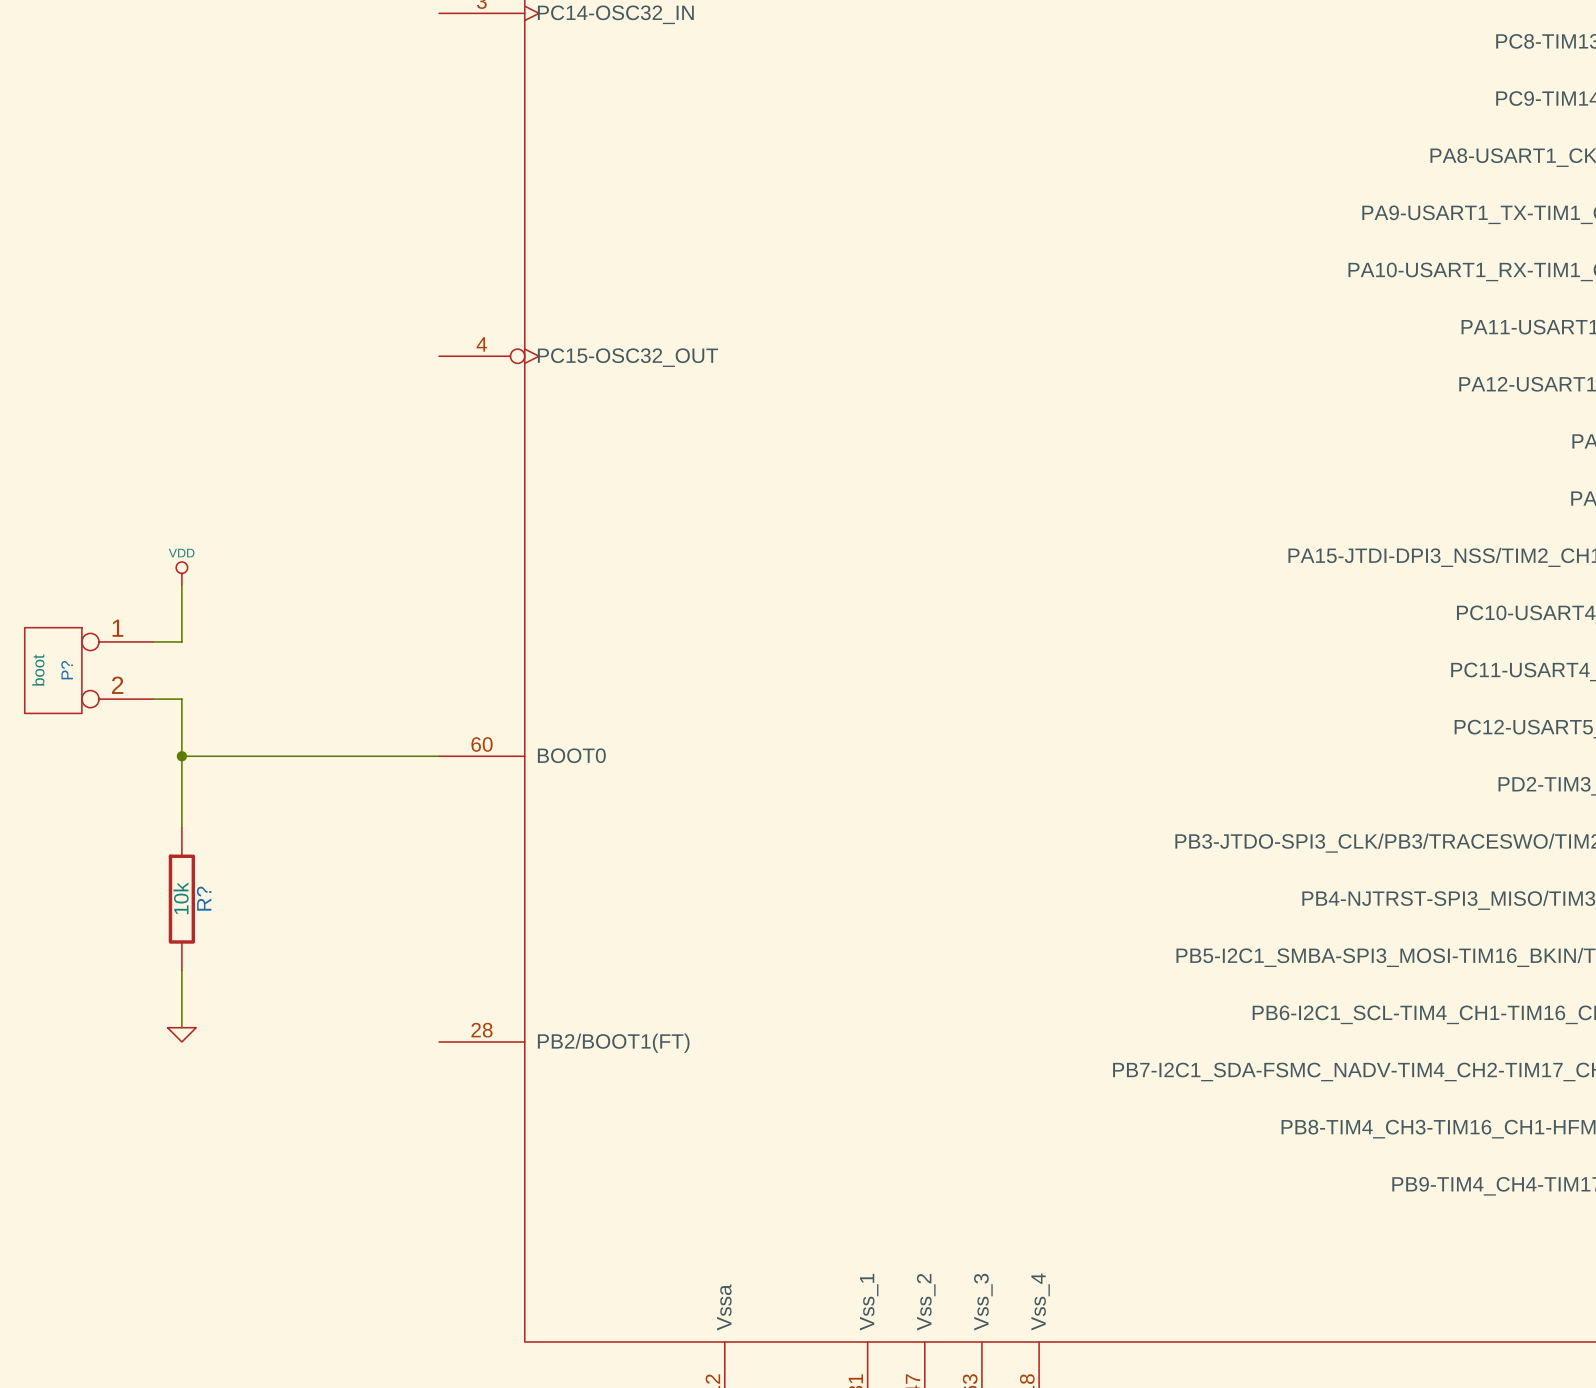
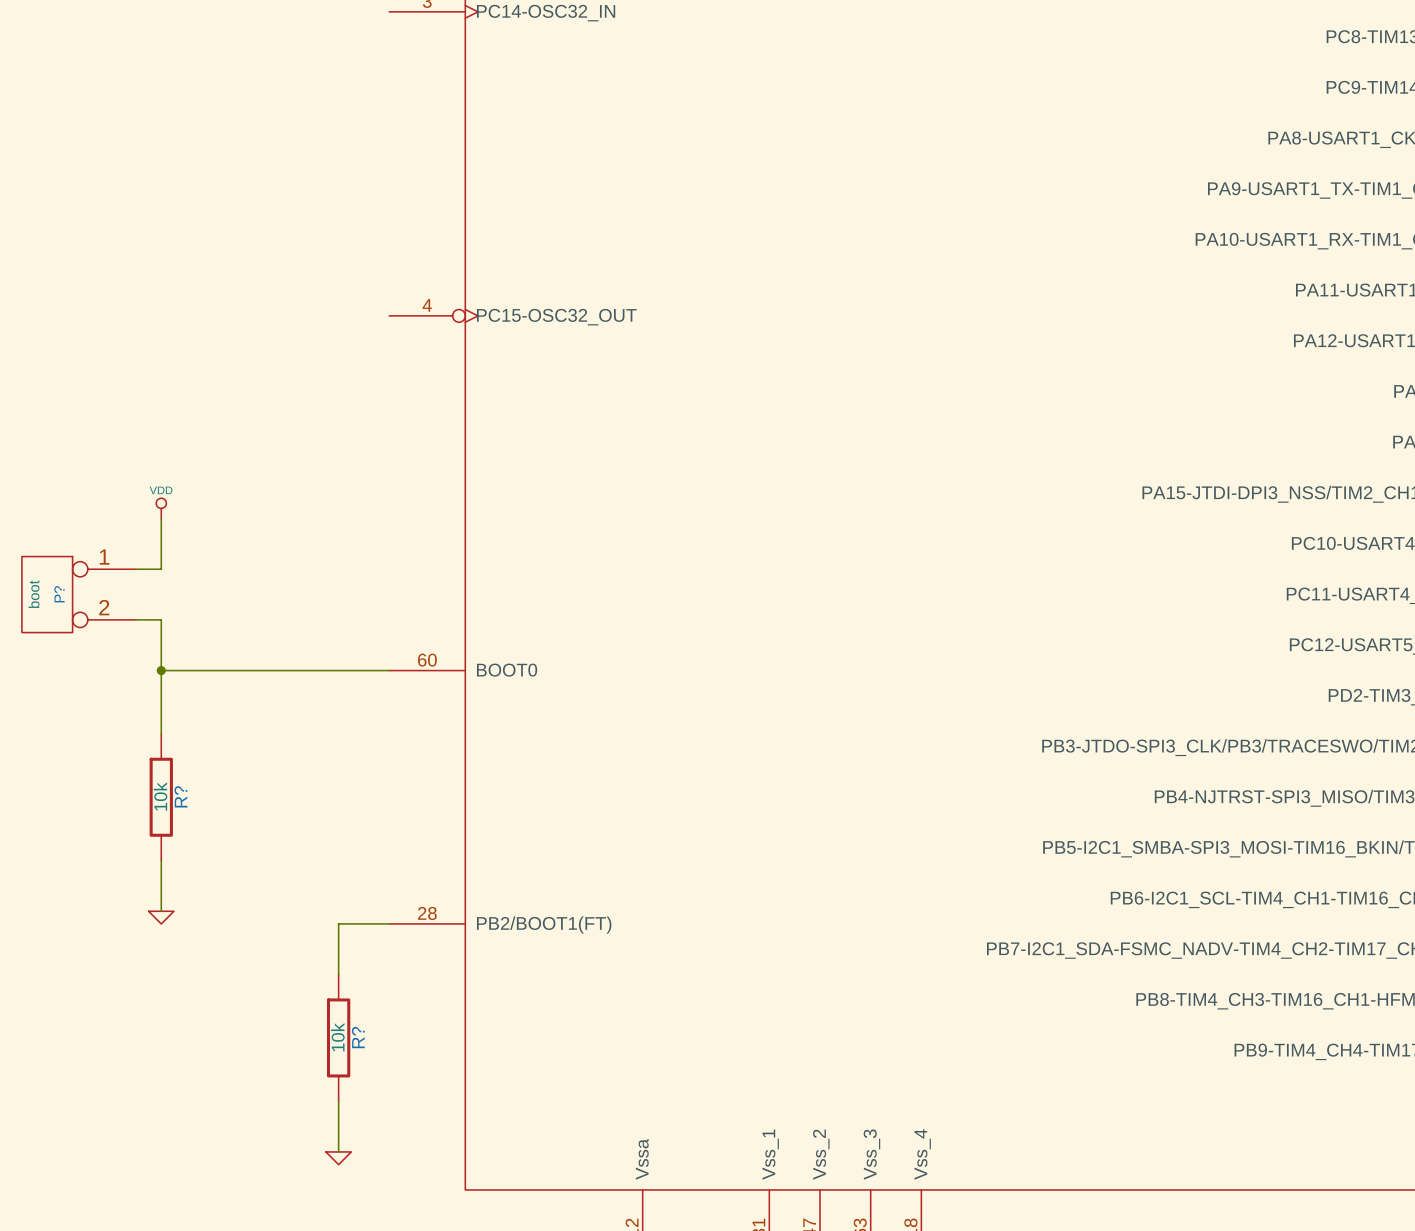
wire: none -> (389, 923) (338, 923) (338, 974)
R?: none -> 10k (338, 1037)
wire: none -> (338, 1101) (338, 1151)
power symbol: none -> (338, 1158)

